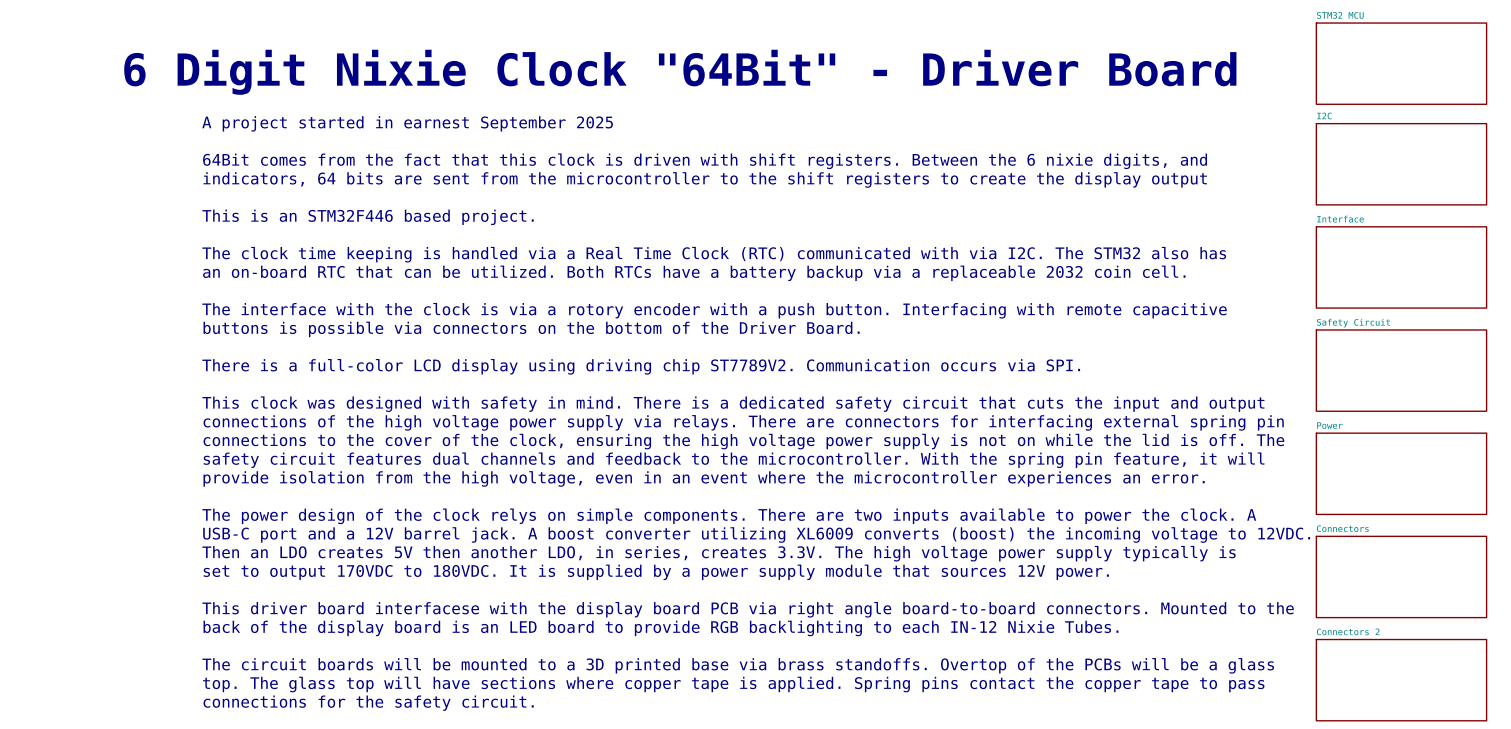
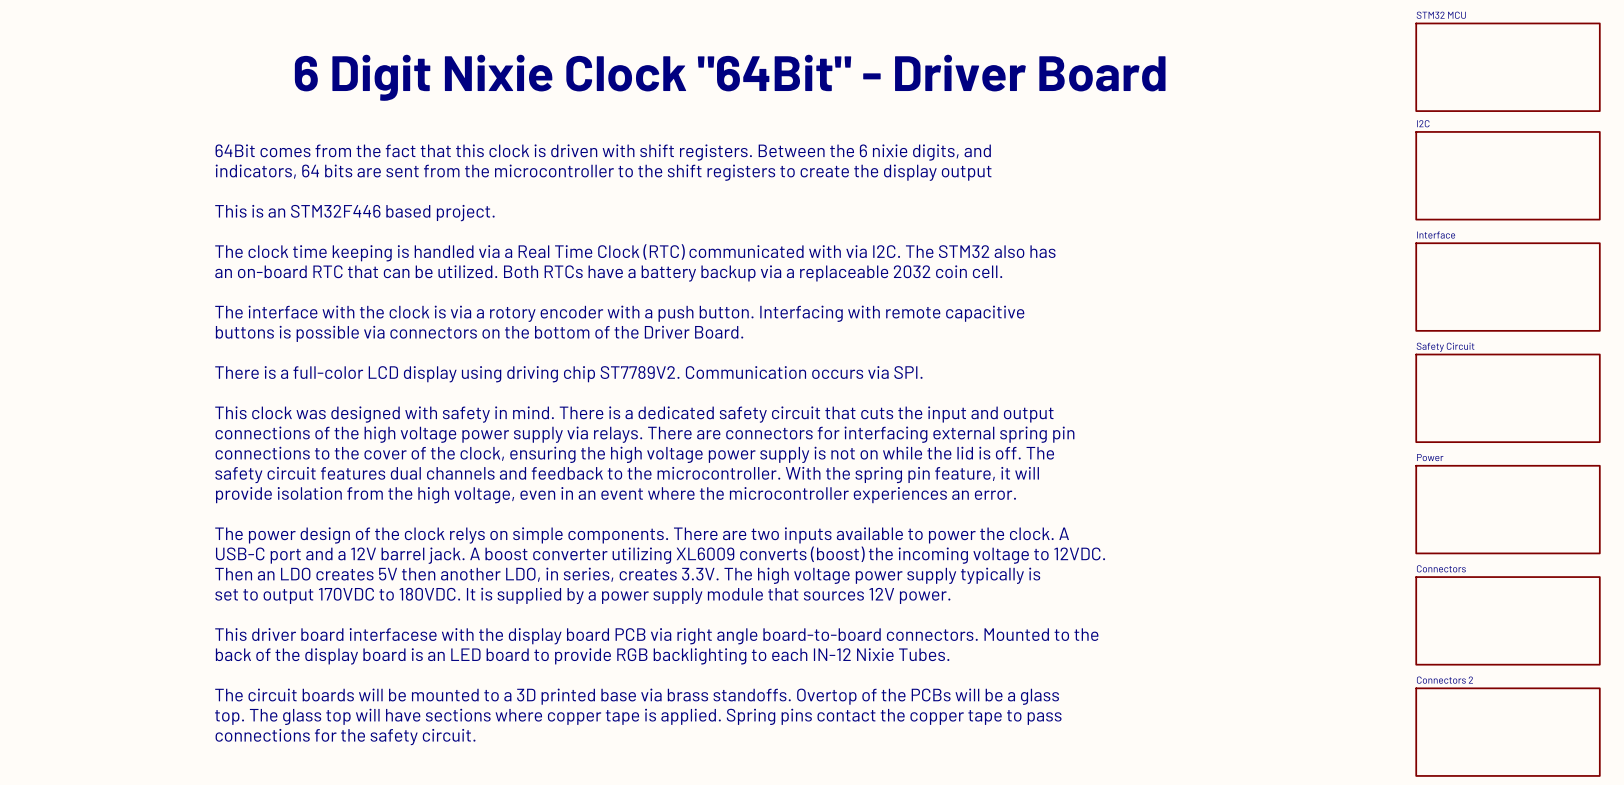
text: A project started in earnest September 2025 (407, 123) -> none
text: none -> 64Bit comes from the fact that this clock is driven with shift registers. Between the 6 nixie digits, and (603, 152)
text: 64Bit comes from the fact that this clock is driven with shift registers. Between the 6 nixie digits, and (705, 161) -> indicators, 64 bits are sent from the microcontroller to the shift registers to create the display output (603, 172)
text: indicators, 64 bits are sent from the microcontroller to the shift registers to create the display output (705, 179) -> none
text position: This is an STM32F446 based project. (368, 217) -> This is an STM32F446 based project. (354, 213)
text: none -> The clock time keeping is handled via a Real Time Clock (RTC) communicated with via I2C. The STM32 also has (635, 252)
text: The clock time keeping is handled via a Real Time Clock (RTC) communicated with via I2C. The STM32 also has (714, 254) -> an on-board RTC that can be utilized. Both RTCs have a battery backup via a replaceable 2032 coin cell. (608, 273)
text: an on-board RTC that can be utilized. Both RTCs have a battery backup via a replaceable 2032 coin cell. (694, 273) -> none
text: none -> The interface with the clock is via a rotory encoder with a push button. Interfacing with remote capacitive (619, 313)
text: The interface with the clock is via a rotory encoder with a push button. Interfacing with remote capacitive (714, 310) -> buttons is possible via connectors on the bottom of the Driver Board. (479, 333)
text: buttons is possible via connectors on the bottom of the Driver Board. (531, 329) -> none
text position: There is a full-color LCD display using driving chip ST7789V2. Communication occurs via SPI. (641, 366) -> There is a full-color LCD display using driving chip ST7789V2. Communication occurs via SPI. (568, 374)
text: none -> This clock was designed with safety in mind. There is a dedicated safety circuit that cuts the input and output (634, 414)
text: This clock was designed with safety in mind. There is a dedicated safety circuit that cuts the input and output (733, 404) -> connections of the high voltage power supply via relays. There are connectors for interfacing external spring pin (644, 434)
text: connections of the high voltage power supply via relays. There are connectors for interfacing external spring pin (743, 422) -> connections to the cover of the clock, ensuring the high voltage power supply is not on while the lid is off. The (634, 454)
text: connections to the cover of the clock, ensuring the high voltage power supply is not on while the lid is off. The (743, 441) -> safety circuit features dual channels and feedback to the microcontroller. With the spring pin feature, it will (627, 475)
text: safety circuit features dual channels and feedback to the microcontroller. With the spring pin feature, it will (734, 460) -> provide isolation from the high voltage, even in an event where the microcontroller experiences an error. (615, 495)
text: provide isolation from the high voltage, even in an event where the microcontroller experiences an error. (704, 478) -> none
text: none -> The power design of the clock relys on simple components. There are two inputs available to power the clock. A (642, 535)
text: The power design of the clock relys on simple components. There are two inputs available to power the clock. A (729, 516) -> USB-C port and a 12V barrel jack. A boost converter utilizing XL6009 converts (boost) the incoming voltage to 12VDC. (660, 555)
text: USB-C port and a 12V barrel jack. A boost converter utilizing XL6009 converts (boost) the incoming voltage to 12VDC. (756, 535) -> Then an LDO creates 5V then another LDO, in series, creates 3.3V. The high voltage power supply typically is (627, 575)
text: Then an LDO creates 5V then another LDO, in series, creates 3.3V. The high voltage power supply typically is (719, 553) -> set to output 170VDC to 180VDC. It is supplied by a power supply module that sources 12V power. (582, 595)
text: set to output 170VDC to 180VDC. It is supplied by a power supply module that sources 12V power. (656, 572) -> none
text: none -> This driver board interfacese with the display board PCB via right angle board-to-board connectors. Mounted to the (656, 636)
text: This driver board interfacese with the display board PCB via right angle board-to-board connectors. Mounted to the (748, 609) -> back of the display board is an LED board to provide RGB backlighting to each IN-12 Nixie Tubes. (582, 656)
text: back of the display board is an LED board to provide RGB backlighting to each IN-12 Nixie Tubes. (660, 628) -> none
text: none -> The circuit boards will be mounted to a 3D printed base via brass standoffs. Overtop of the PCBs will be a glass (637, 696)
text: The circuit boards will be mounted to a 3D printed base via brass standoffs. Overtop of the PCBs will be a glass (738, 665) -> top. The glass top will have sections where copper tape is applied. Spring pins contact the copper tape to pass (638, 716)
text: top. The glass top will have sections where copper tape is applied. Spring pins contact the copper tape to pass (733, 684) -> connections for the safety circuit. (345, 737)
text: connections for the safety circuit. (368, 703) -> none

